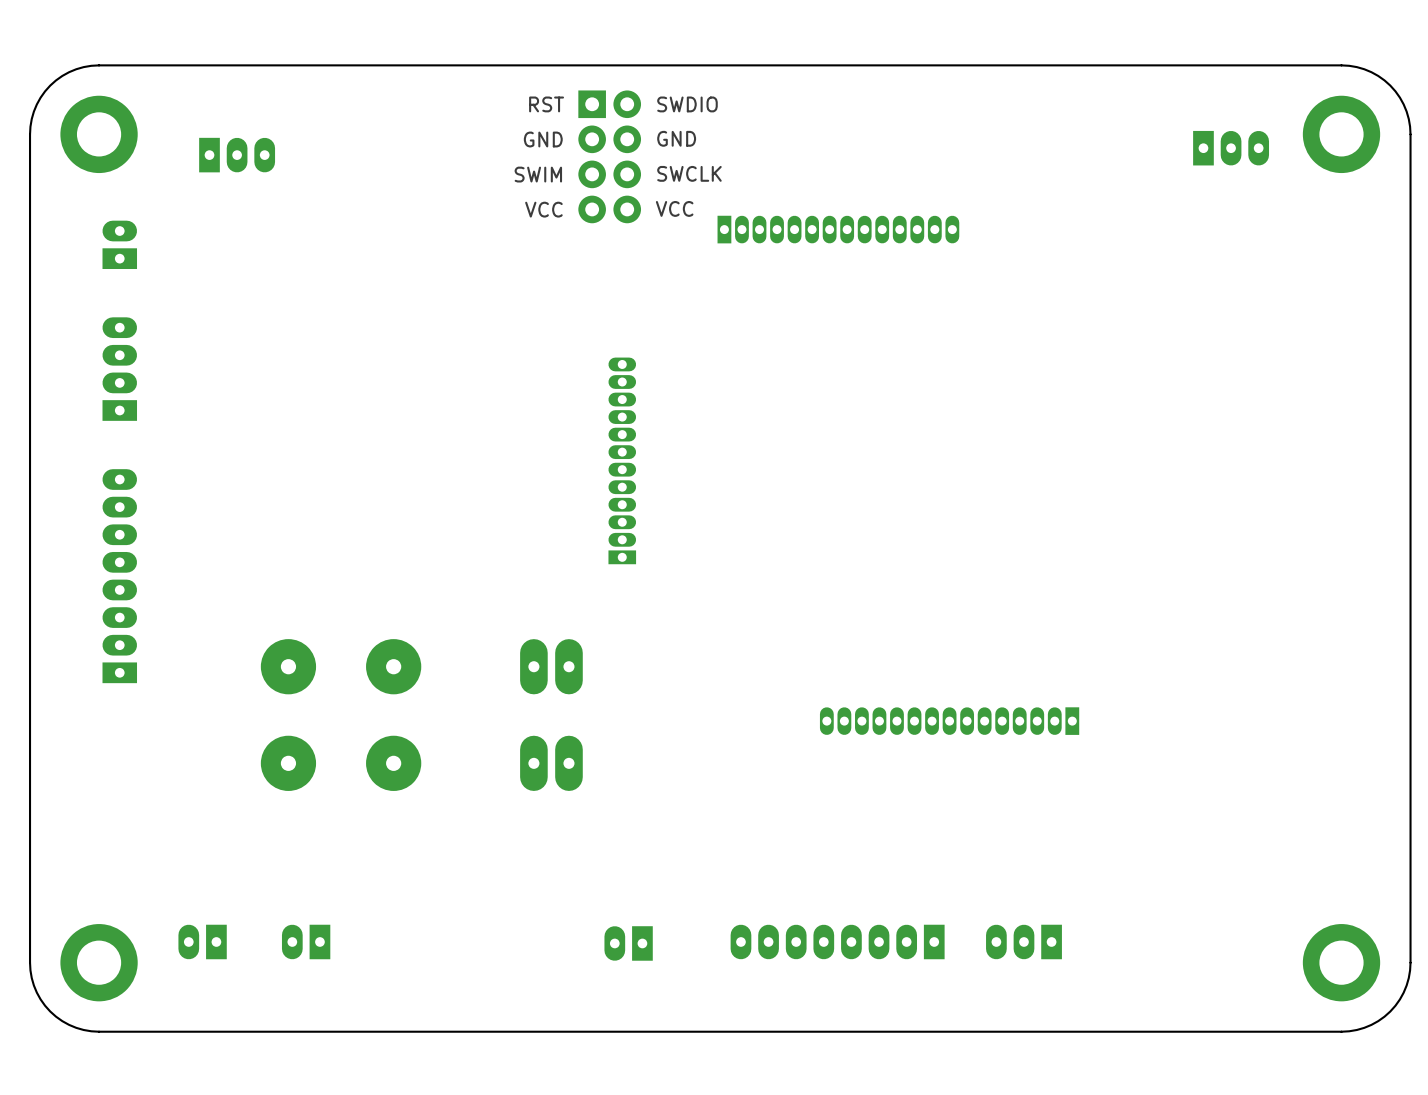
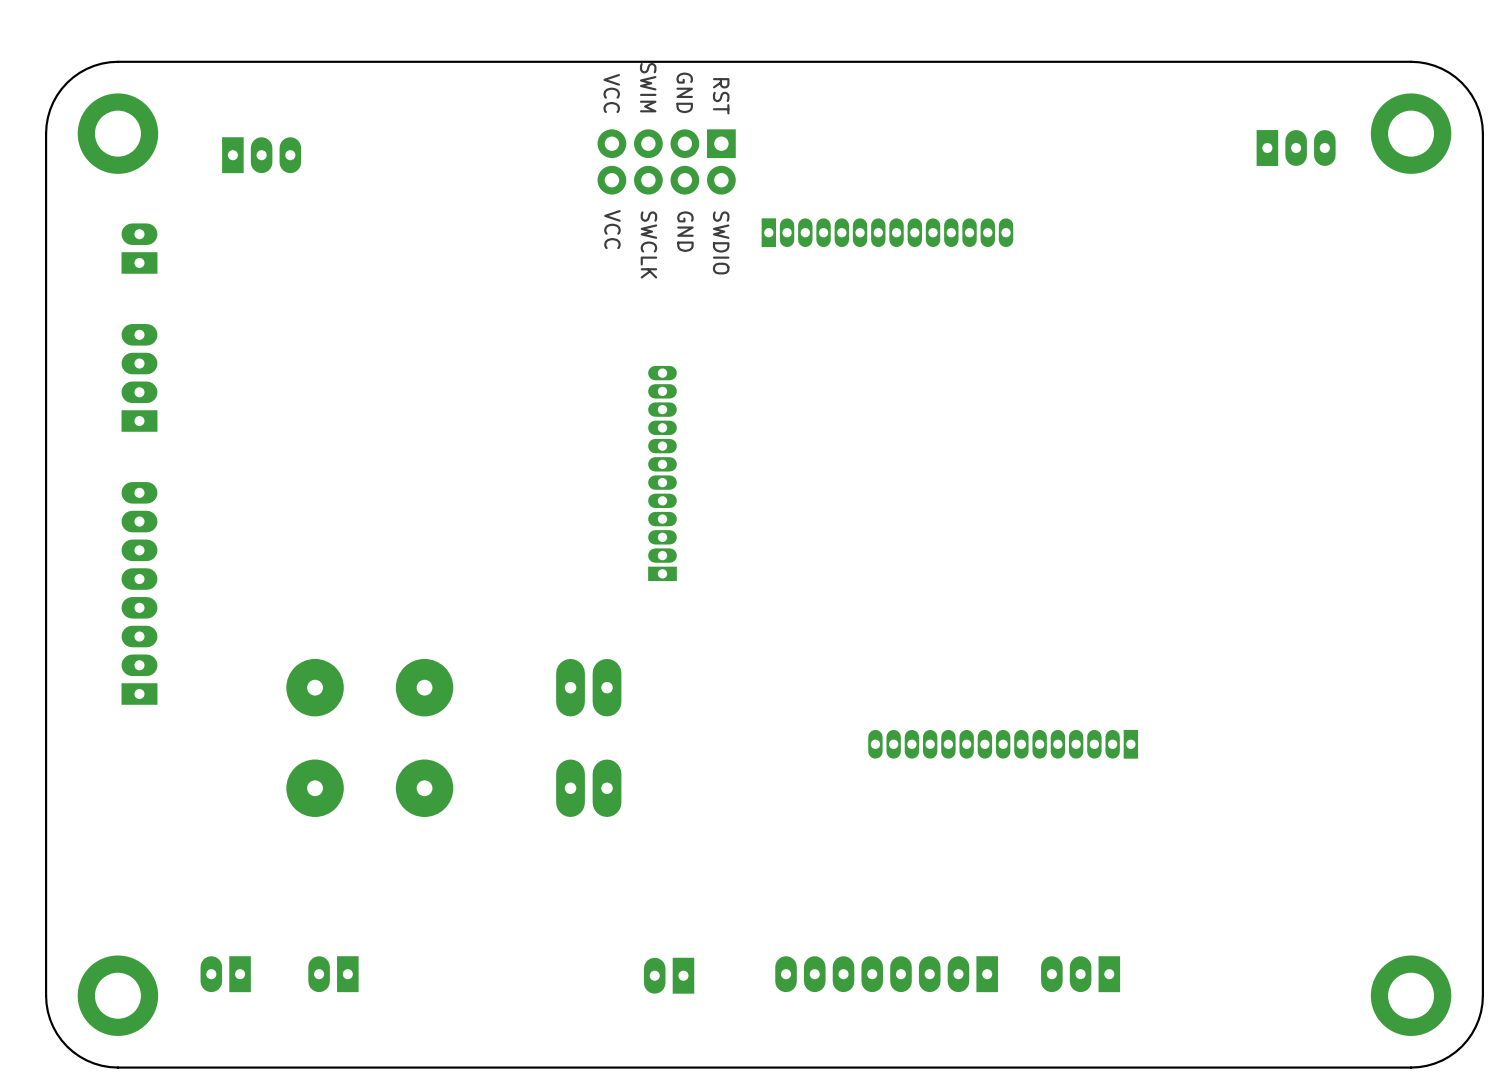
part rotation: 0° (609, 156) -> 90° clockwise (666, 161)

